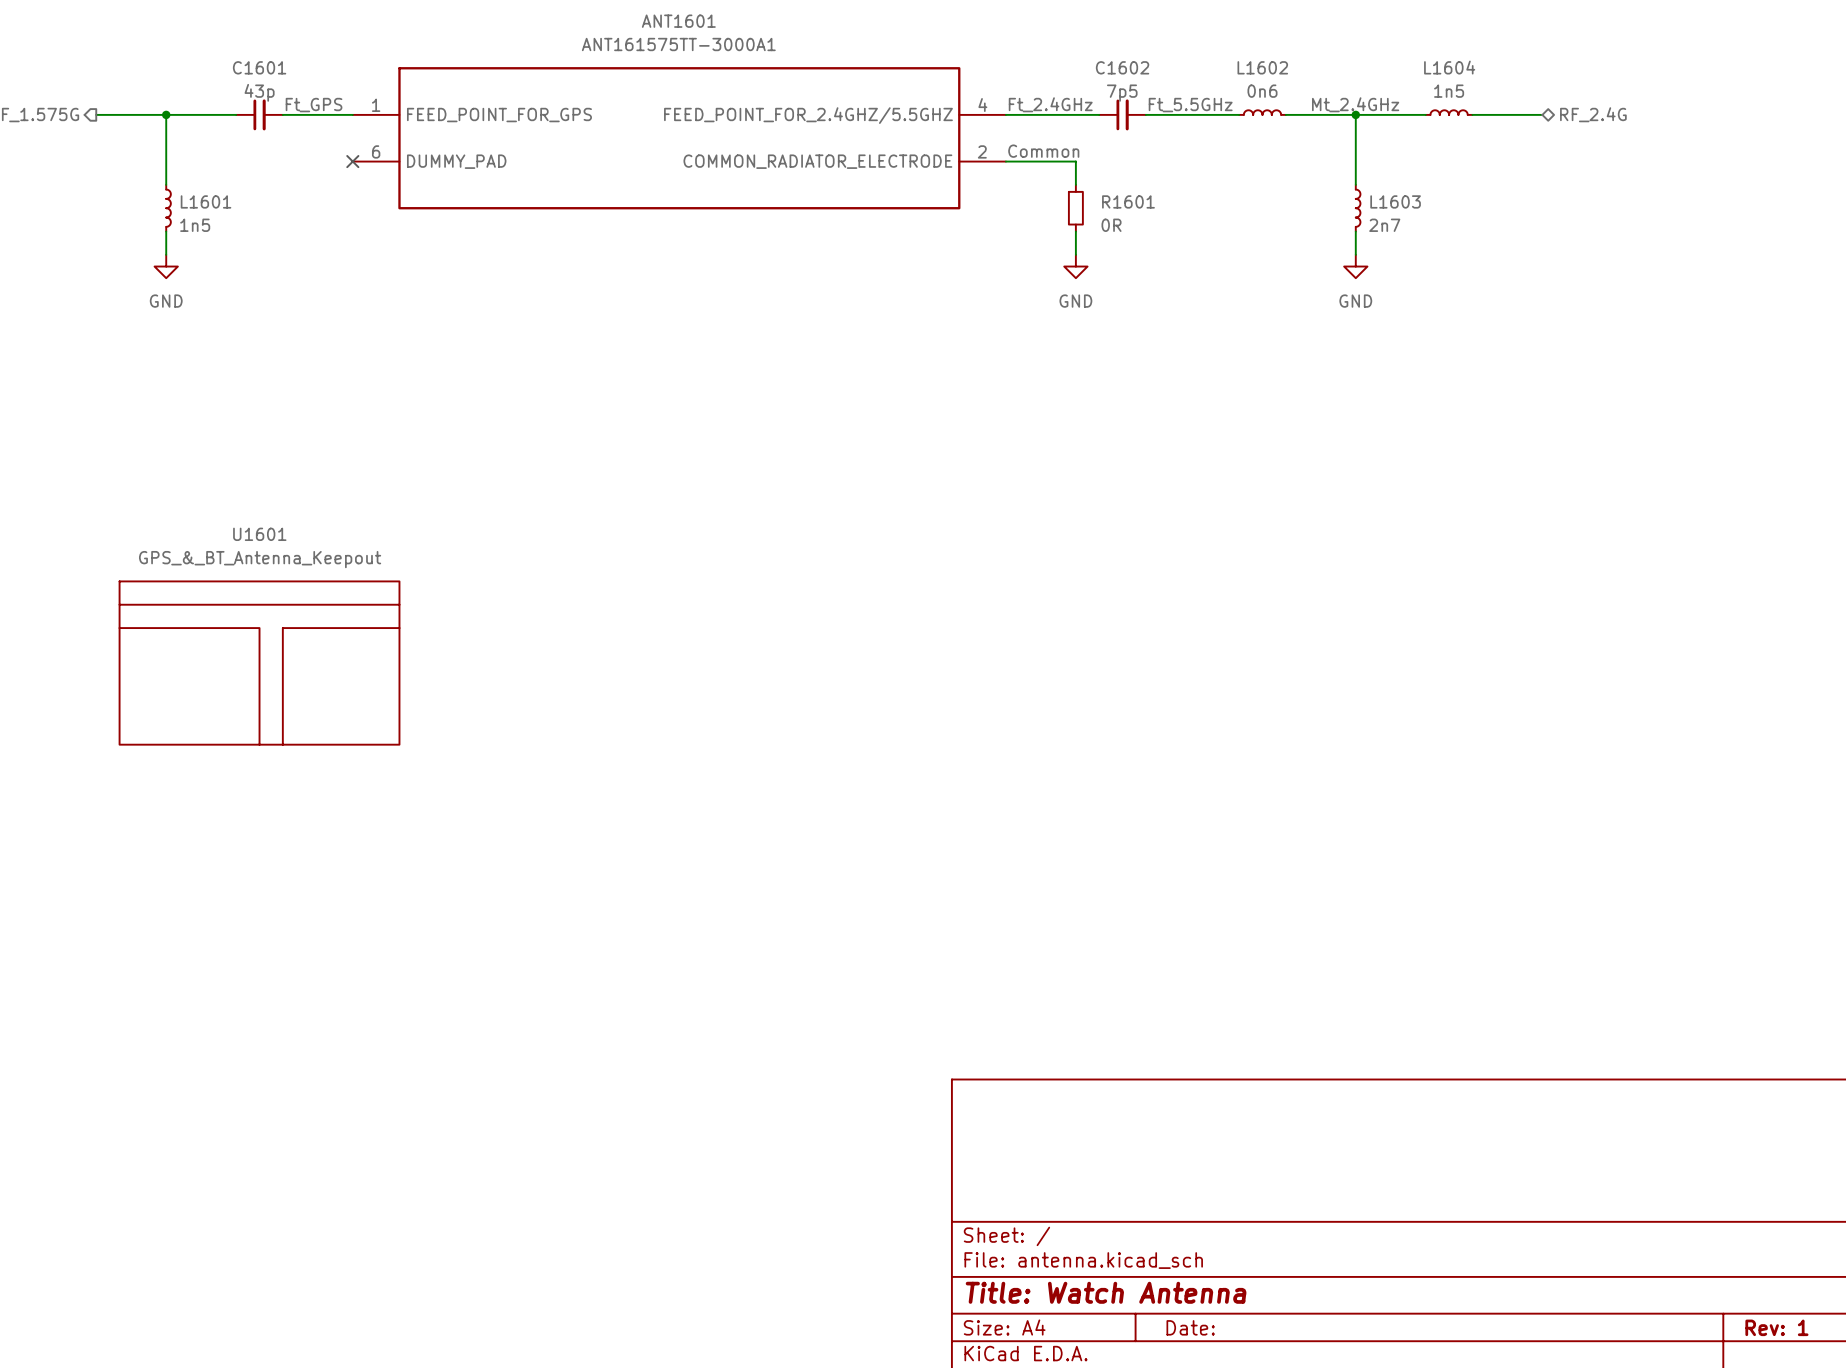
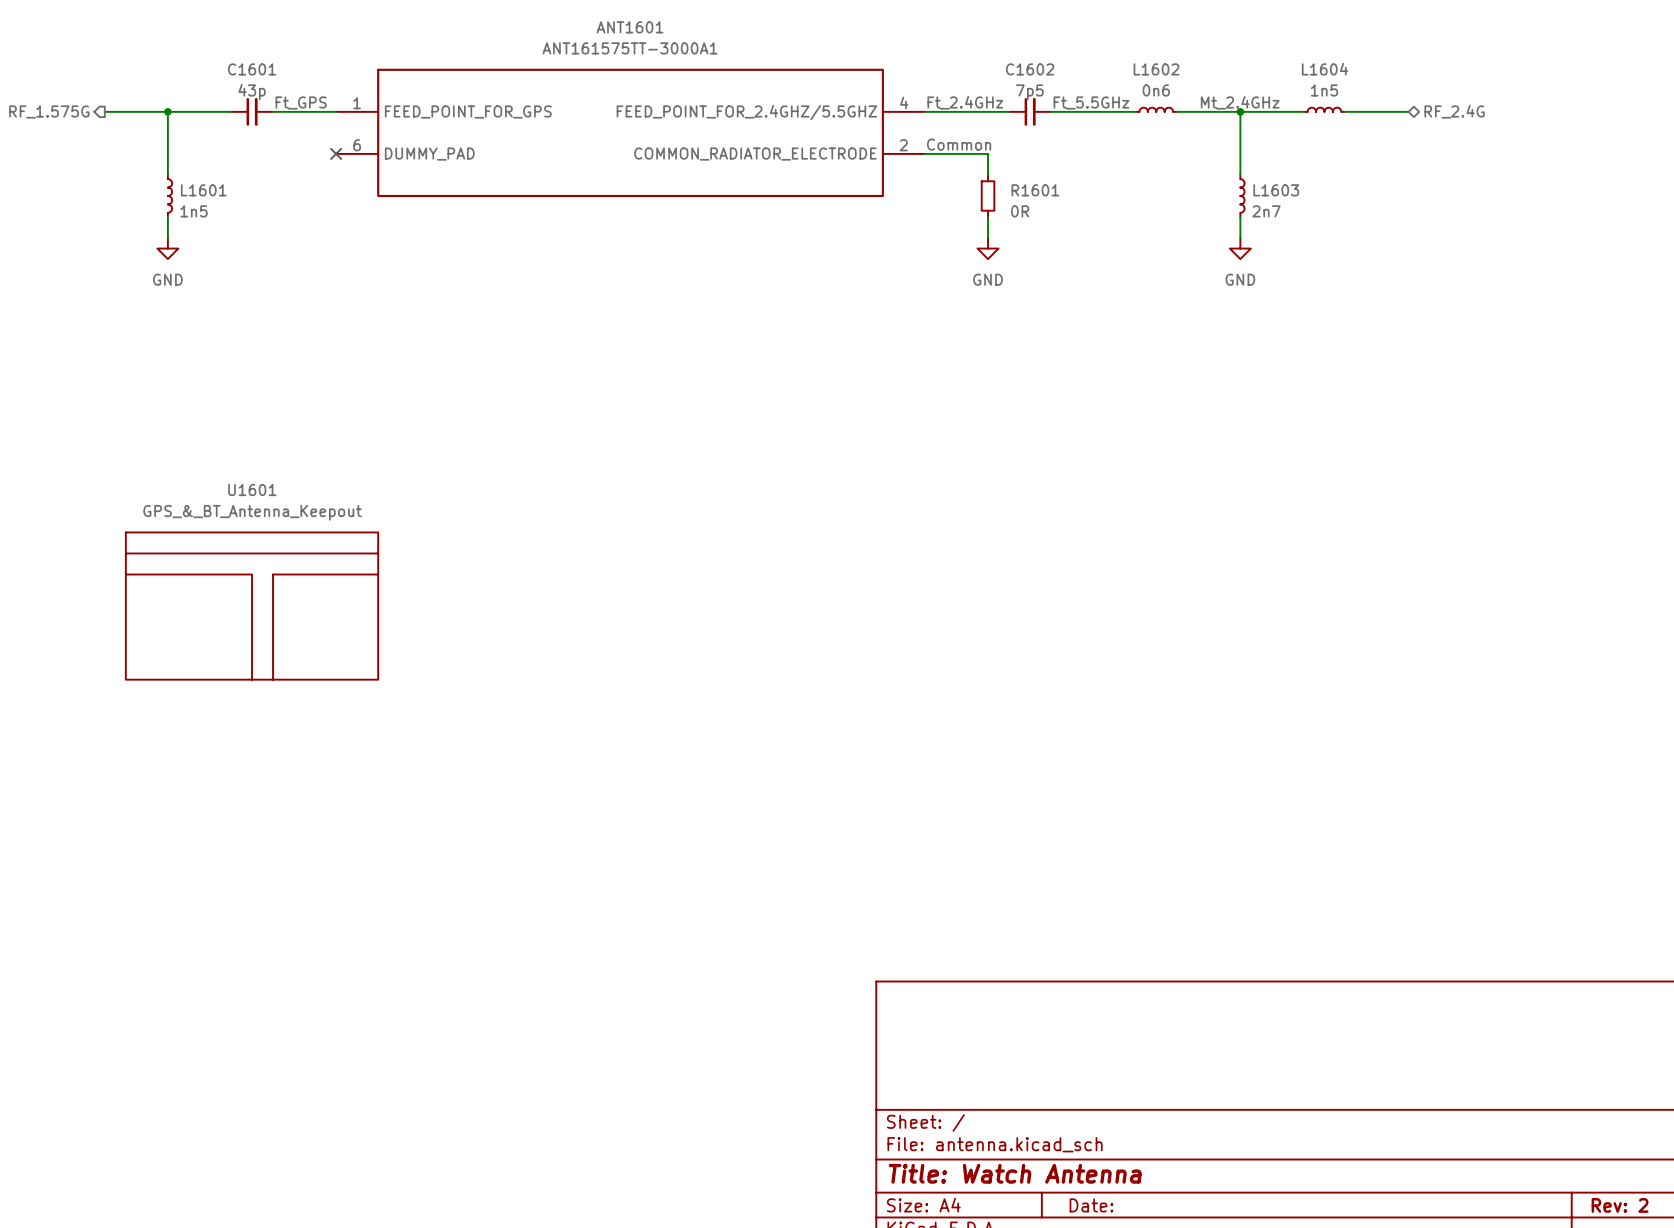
title block: Rev: 1 (1776, 1327) -> Rev: 2 (1620, 1205)

